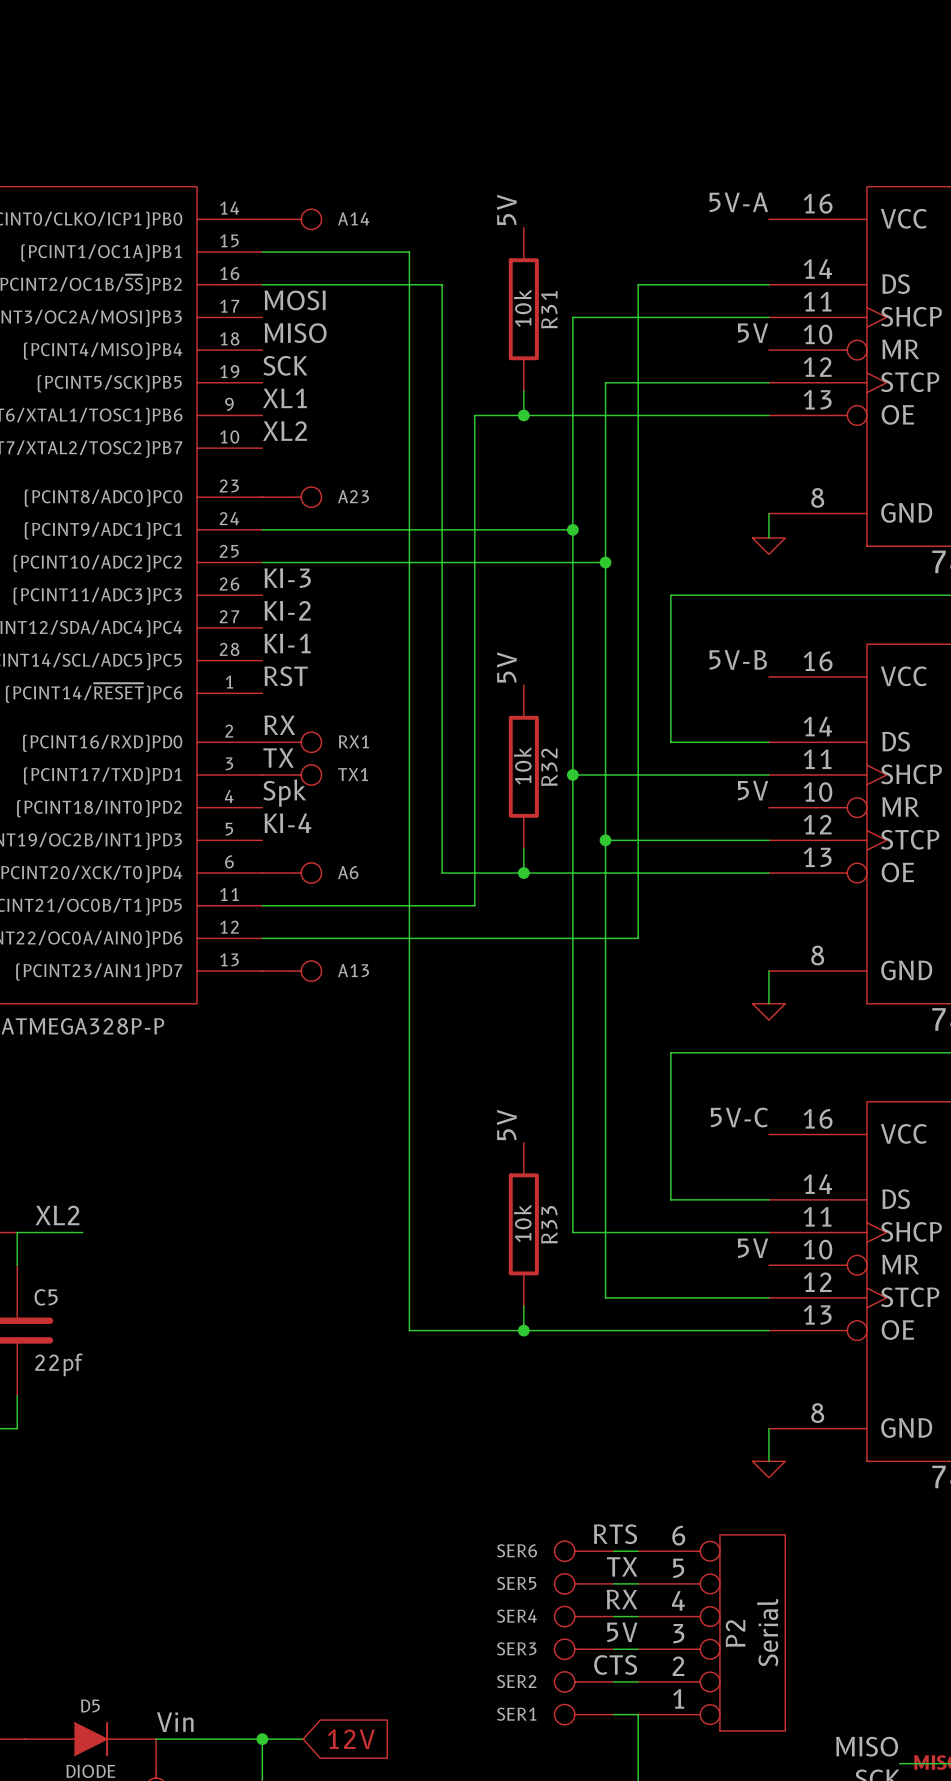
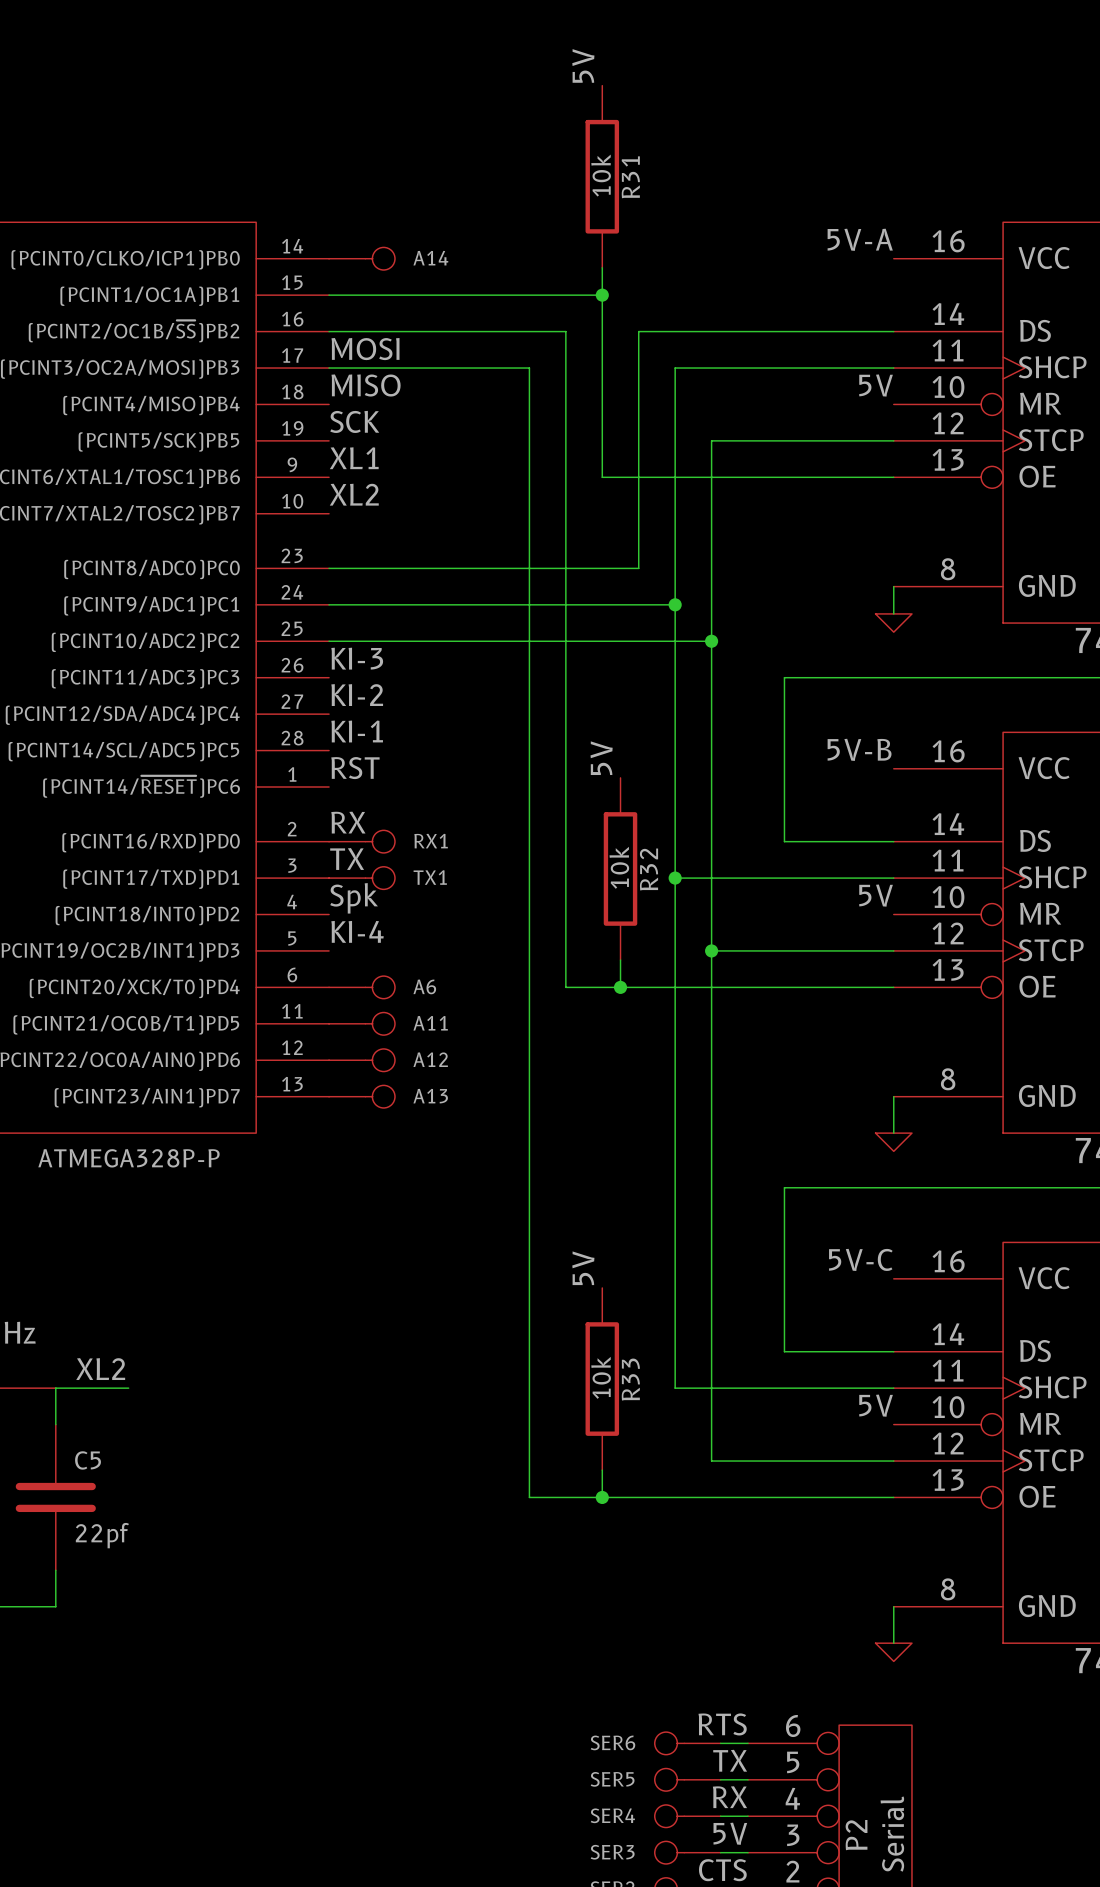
label position: 5V (506, 209) -> 5V (583, 65)
wire: (409, 252) (409, 1330) (442, 1330) -> (492, 295) (602, 295)
junction: none -> (602, 295)
wire: (442, 284) (442, 317) -> (529, 331) (565, 331) (565, 477)
wire: (638, 284) (638, 938) (262, 938) -> (748, 331) (638, 331) (638, 568) (329, 568)
R31 position: (523, 309) -> (602, 176)
wire: none -> (329, 368) (529, 368)
wire: (523, 390) (523, 415) -> none
wire: (474, 415) (507, 415) -> (602, 267) (602, 477)
junction: (523, 415) -> none
A23: (291, 497) -> none
wire: (442, 873) (474, 873) (474, 905) (262, 905) -> (529, 987) (529, 1497)
A11: none -> (362, 1023)
A12: none -> (362, 1060)
label position: 5V (506, 1125) -> 5V (583, 1268)
R33 position: (523, 1224) -> (602, 1379)
wire: (523, 1306) (523, 1330) -> (602, 1470) (602, 1497)
junction position: (523, 1330) -> (602, 1497)

